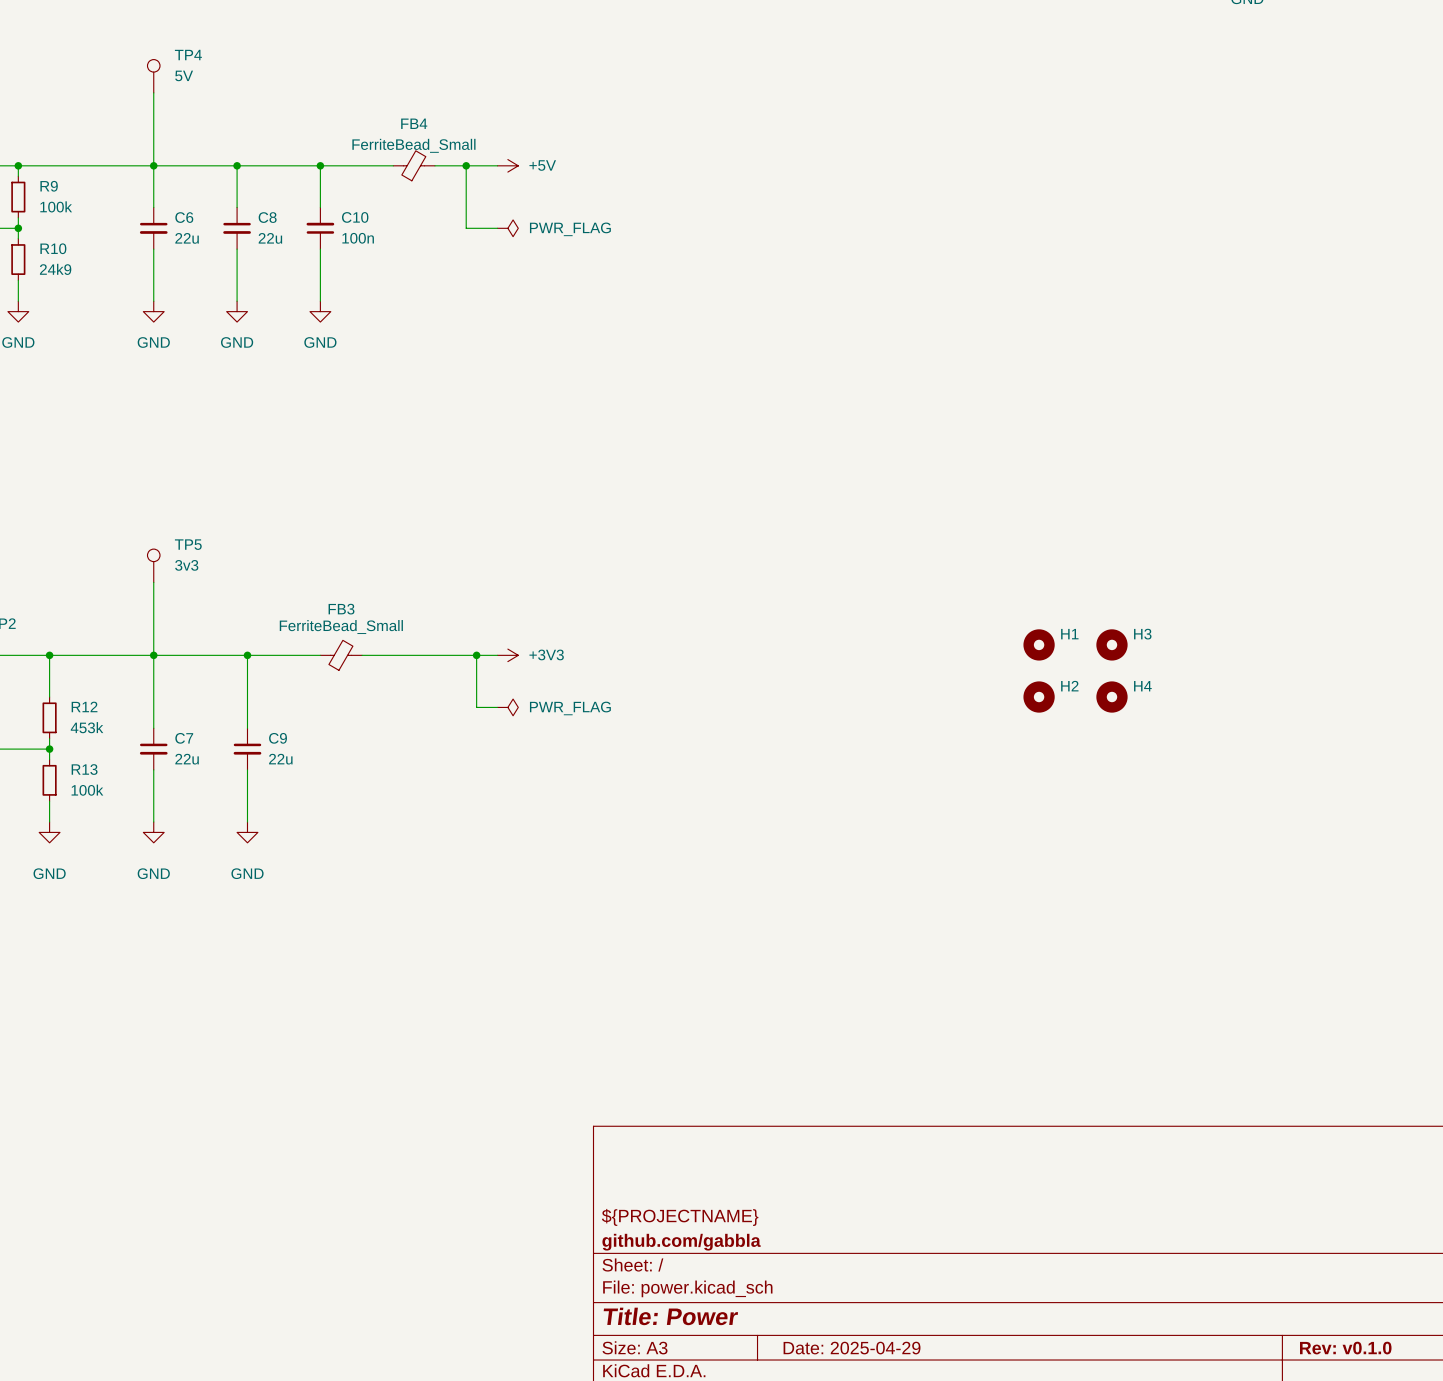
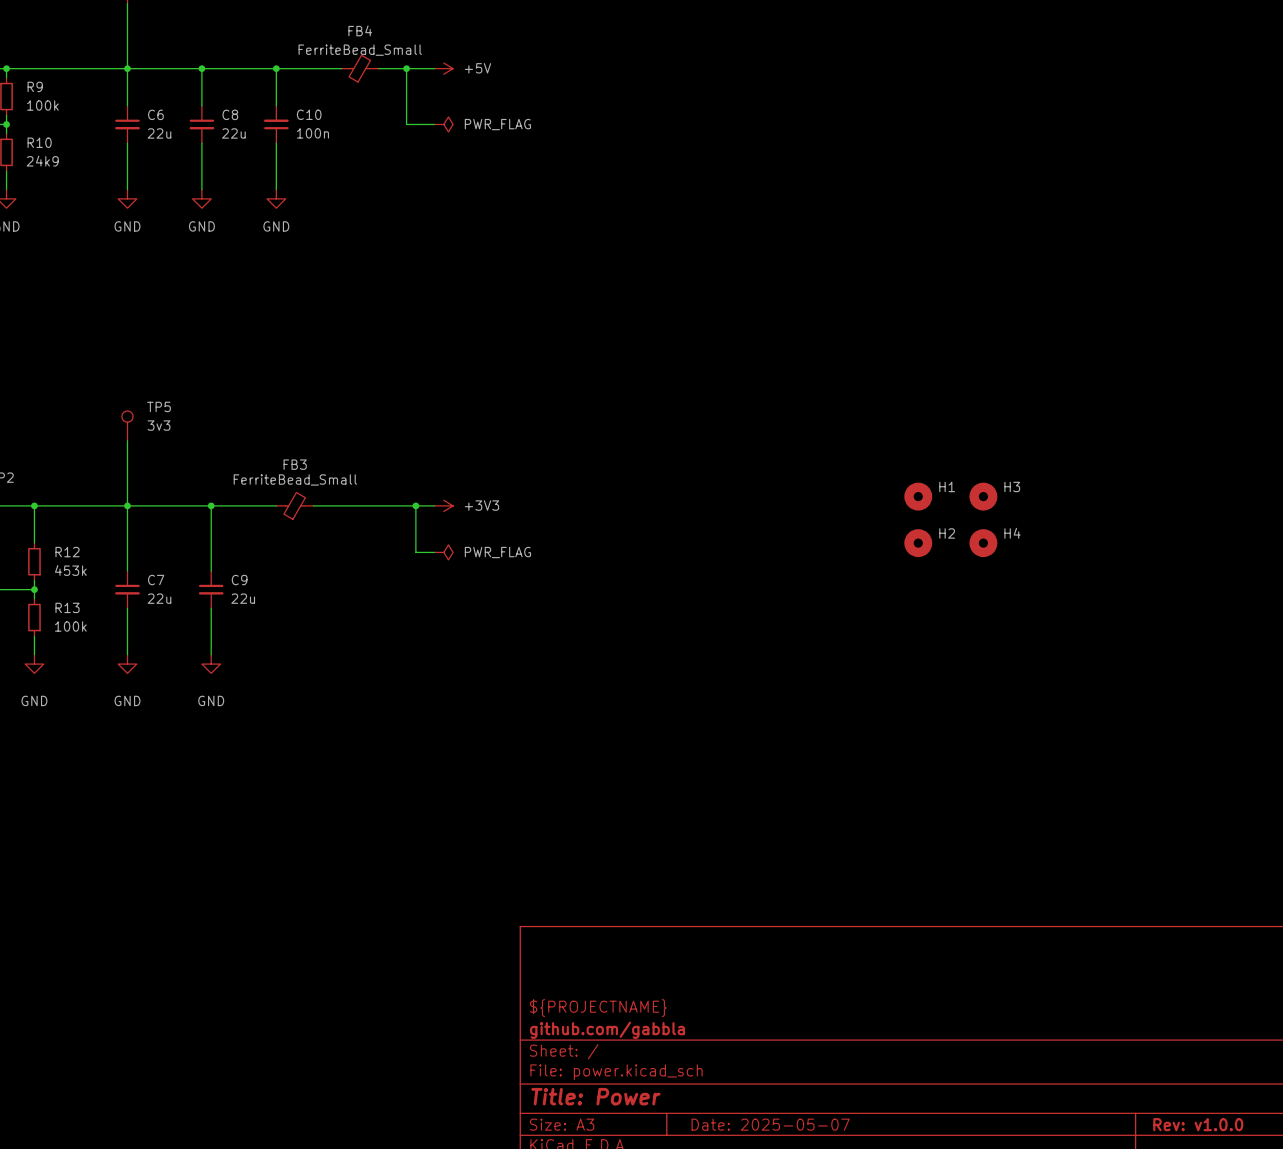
title block: Date: 2025-04-29 (852, 1348) -> Date: 2025-05-07 (770, 1124)
title block: Rev: v0.1.0 (1345, 1348) -> Rev: v1.0.0 (1198, 1124)

